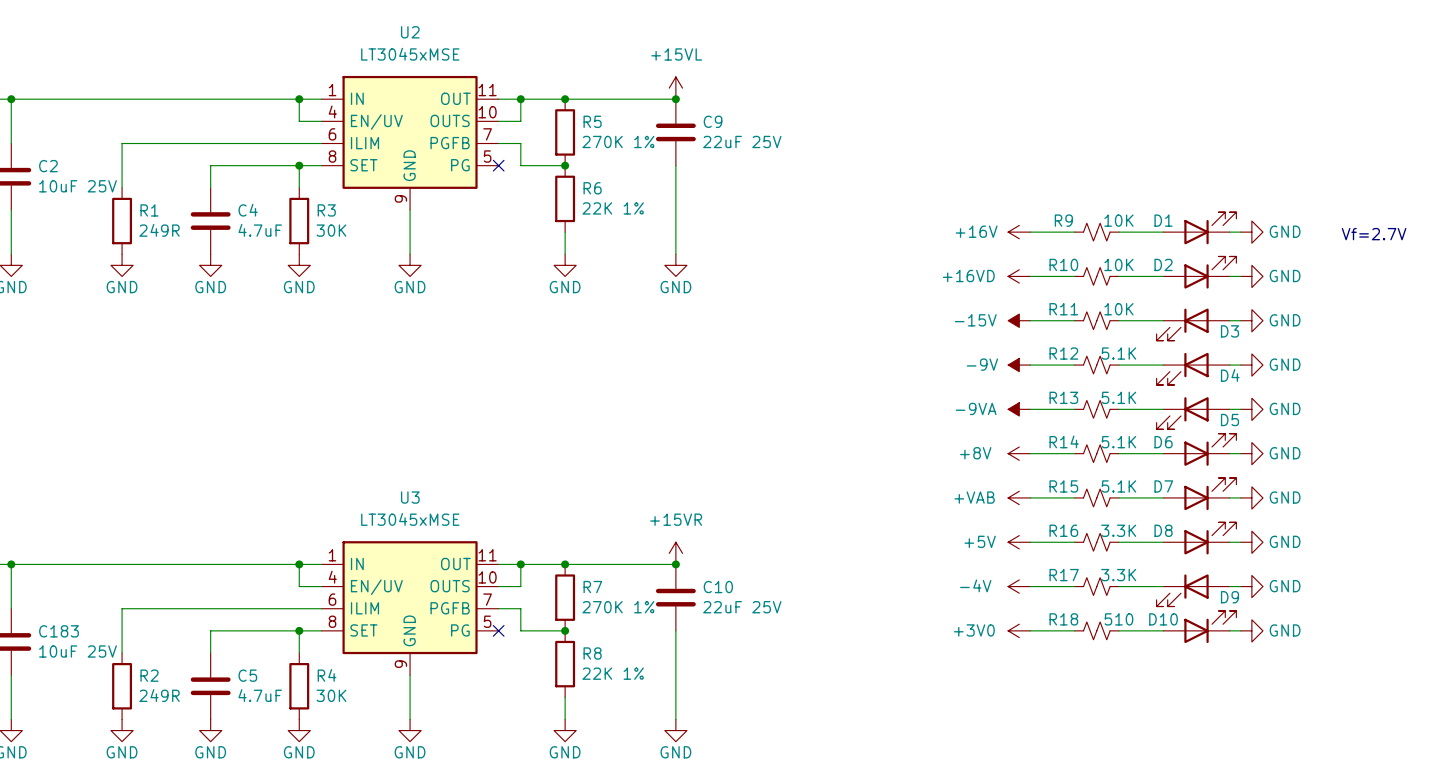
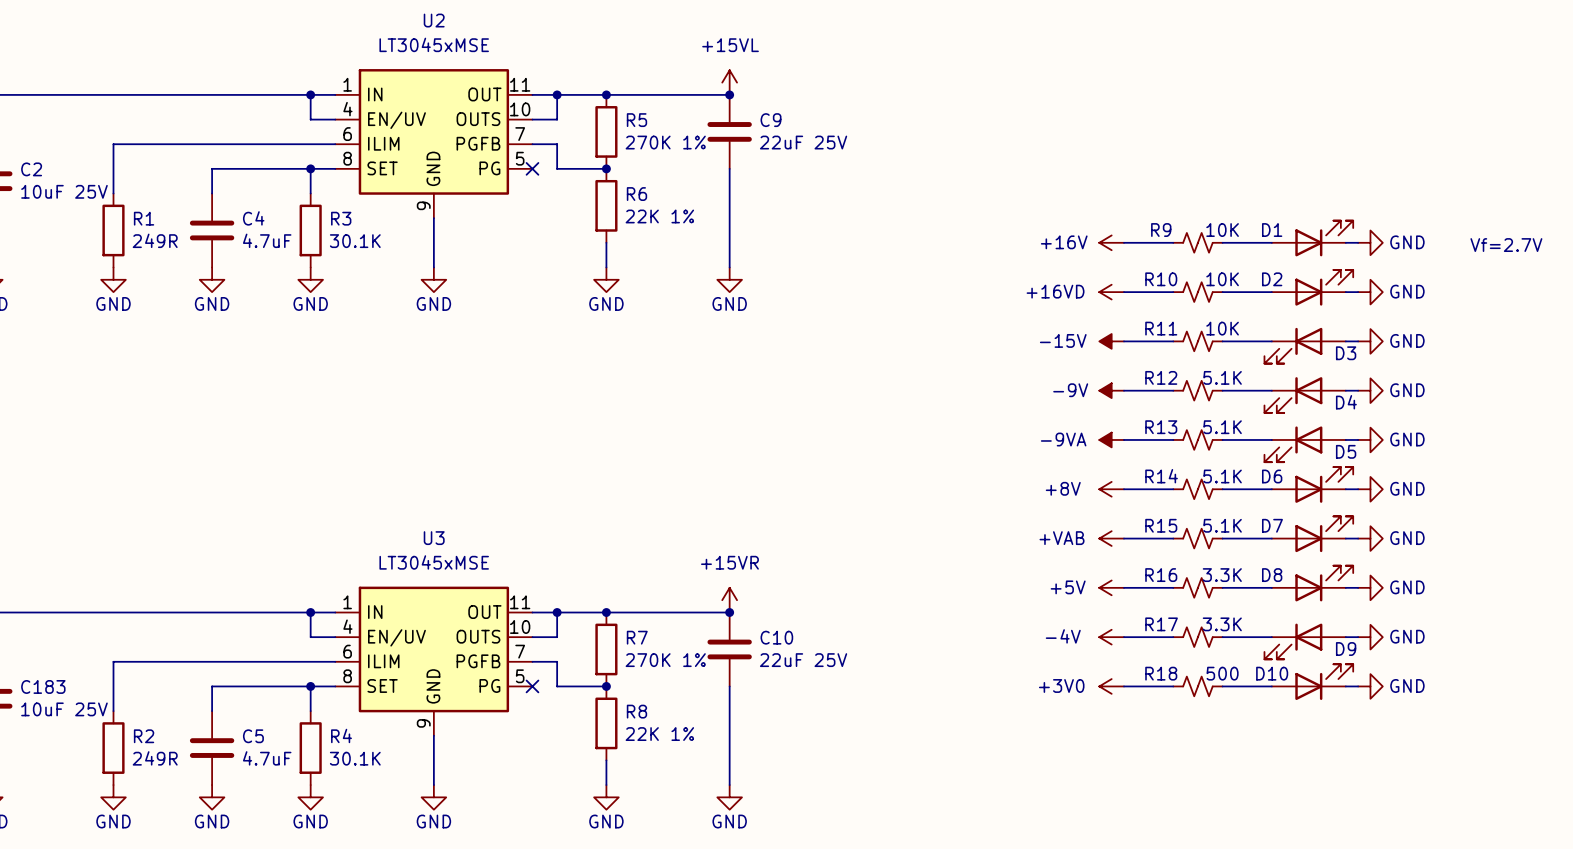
R3 value: 30K (331, 230) -> 30.1K (355, 241)
R18 value: 510 (1118, 619) -> 500 (1222, 673)
R4 value: 30K (331, 695) -> 30.1K (355, 758)

